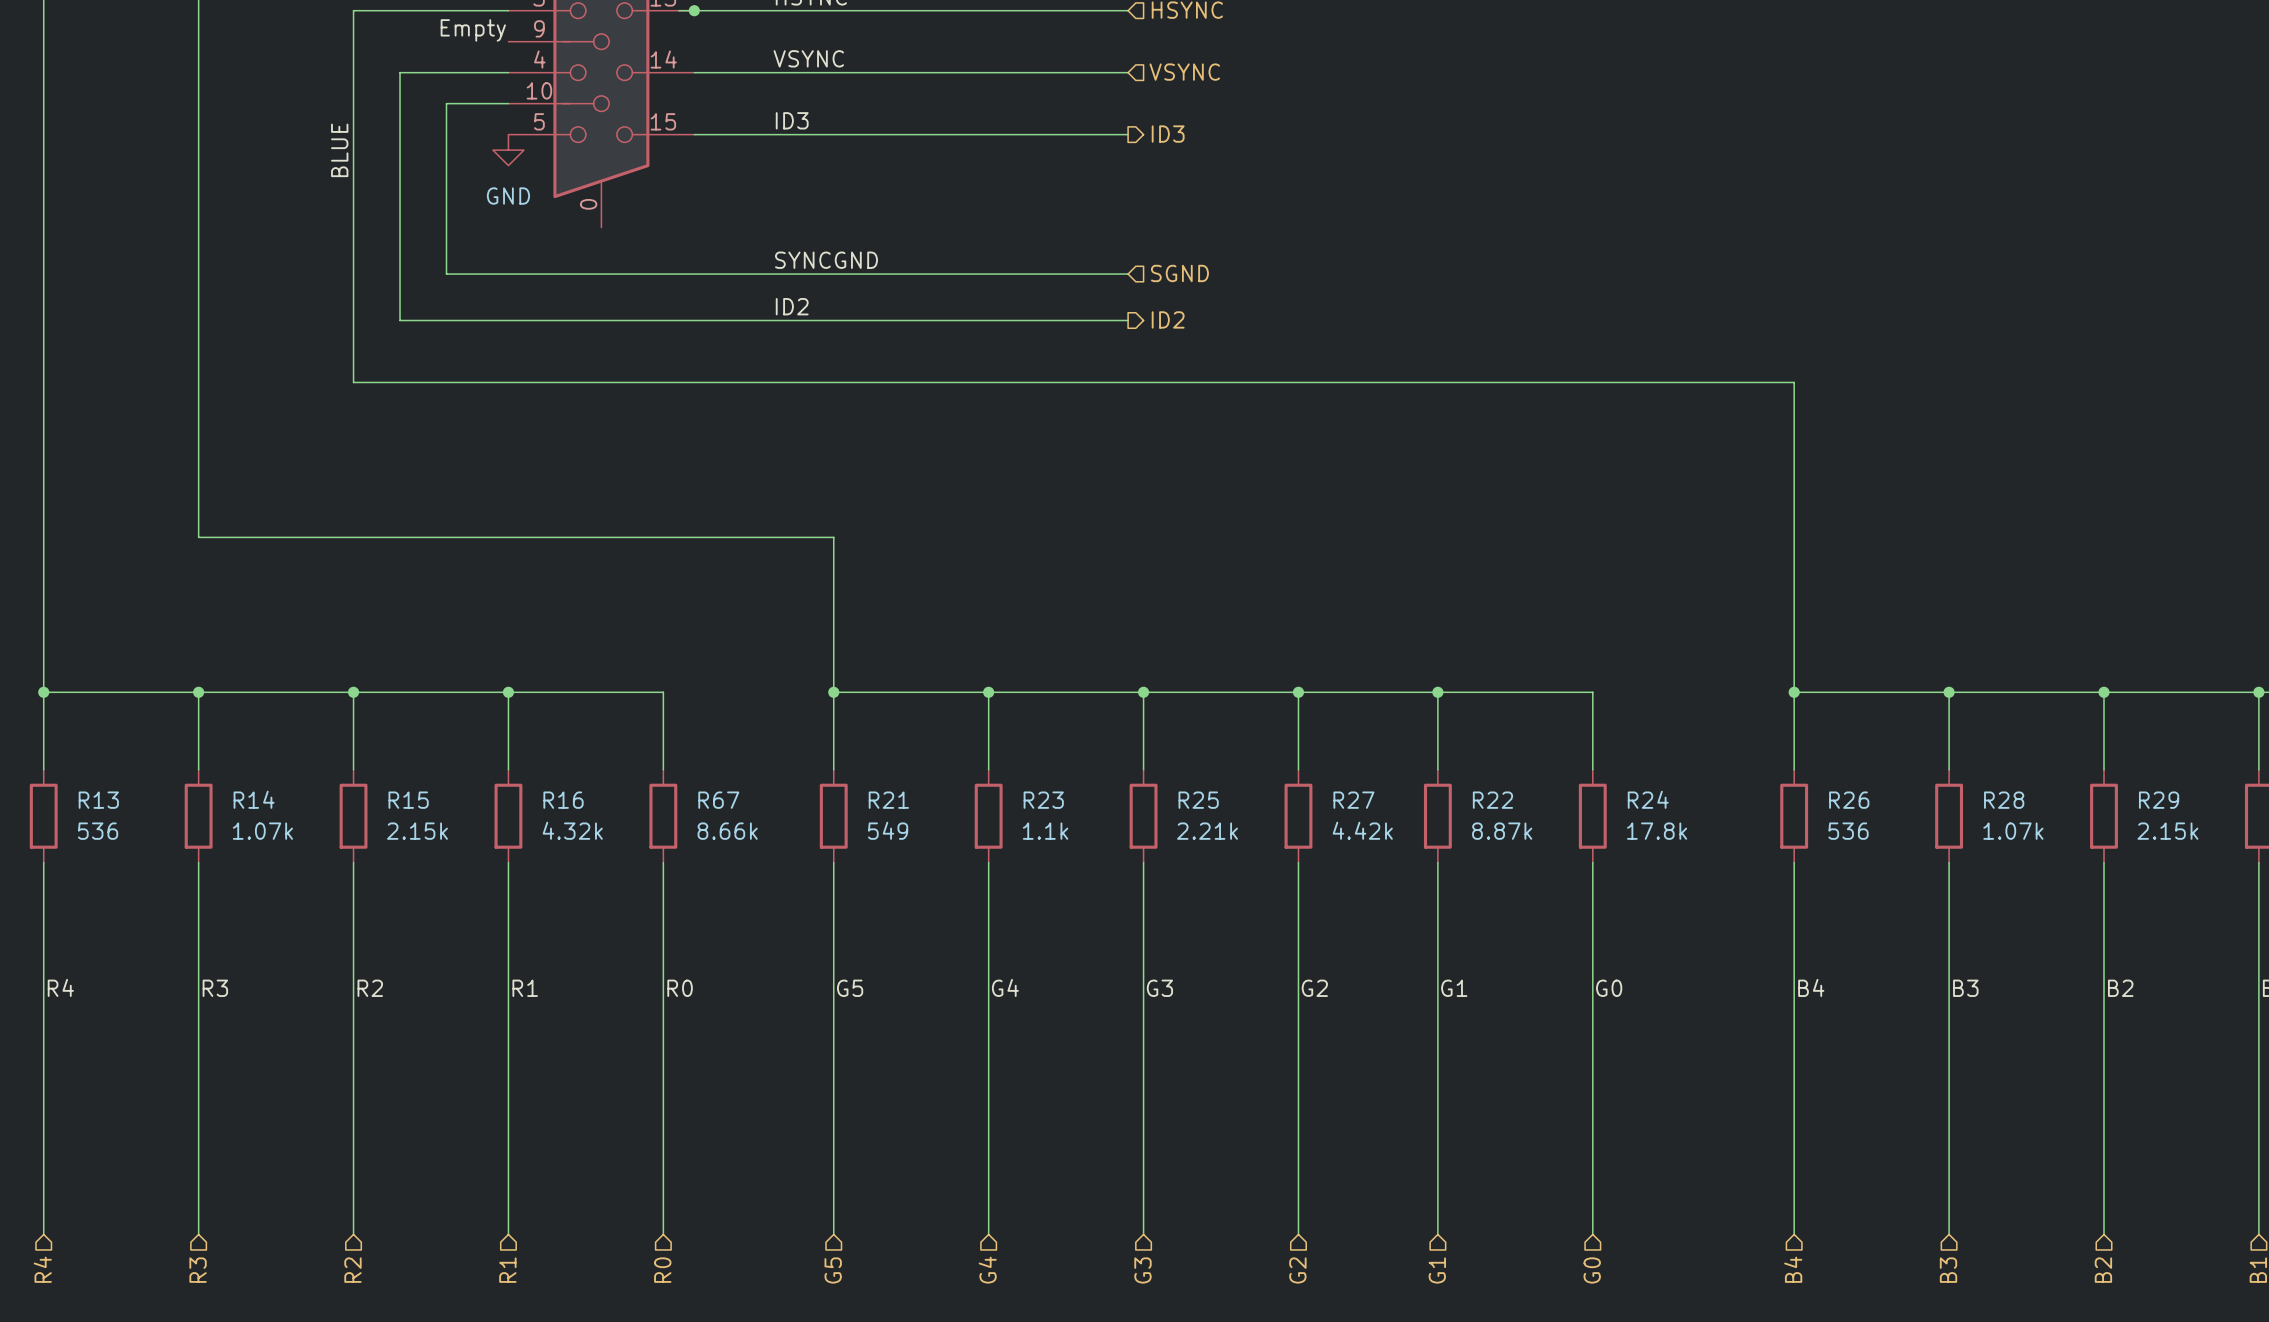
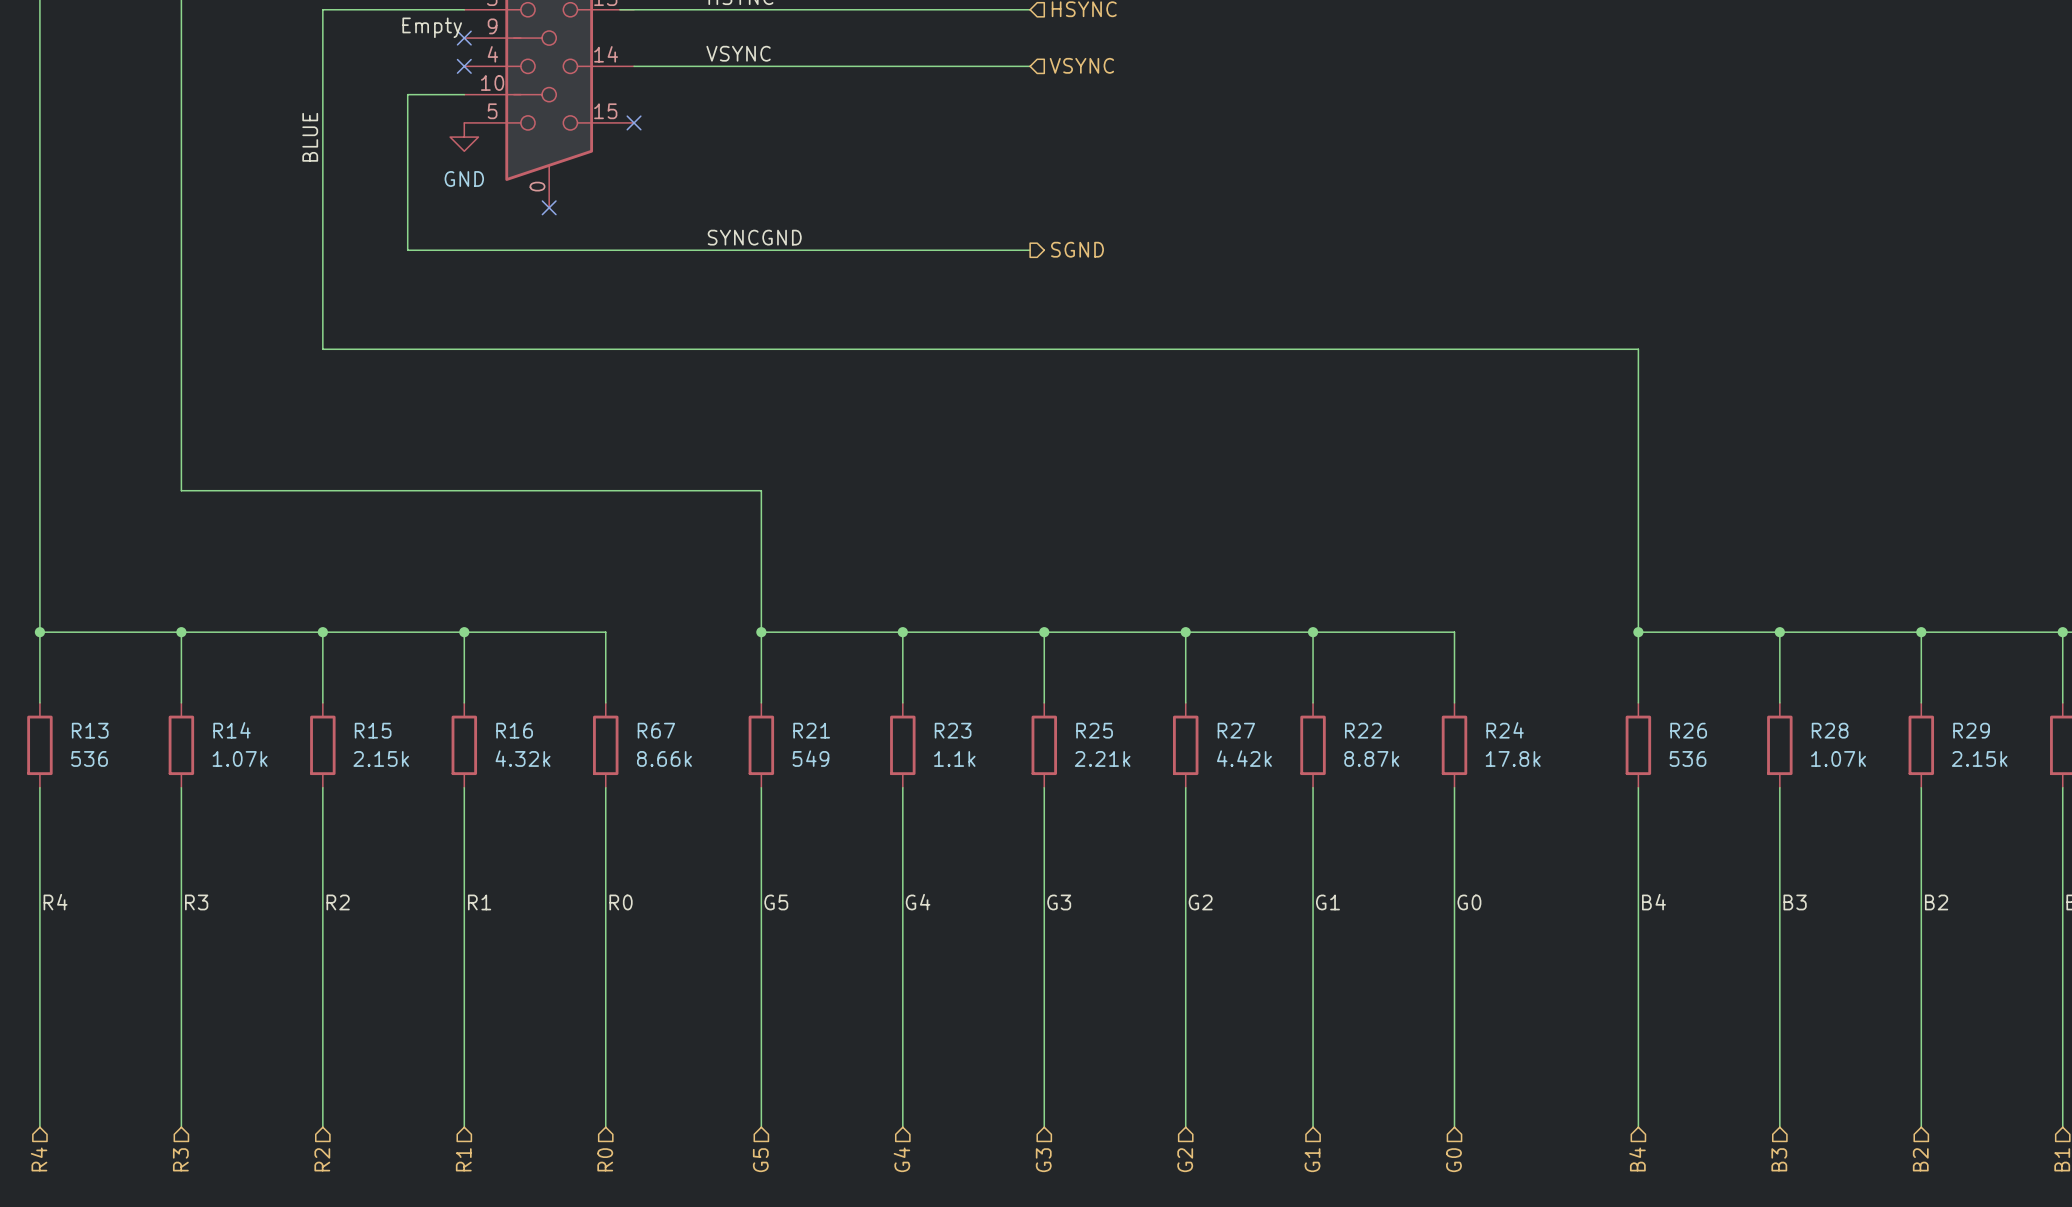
junction: (694, 10) -> none
no-connect mark: none -> (464, 38)
wire: (508, 72) (400, 72) (400, 320) (1128, 320) -> none
no-connect mark: none -> (464, 66)
label: ID3 (792, 120) -> none
wire: (694, 134) (1128, 134) -> none
no-connect mark: none -> (634, 122)
hierarchical label: ID3 (1168, 134) -> none
no-connect mark: none -> (549, 207)
hierarchical label shape: input (1179, 273) -> output (1077, 249)
label: ID2 (792, 306) -> none
hierarchical label: ID2 (1168, 319) -> none

